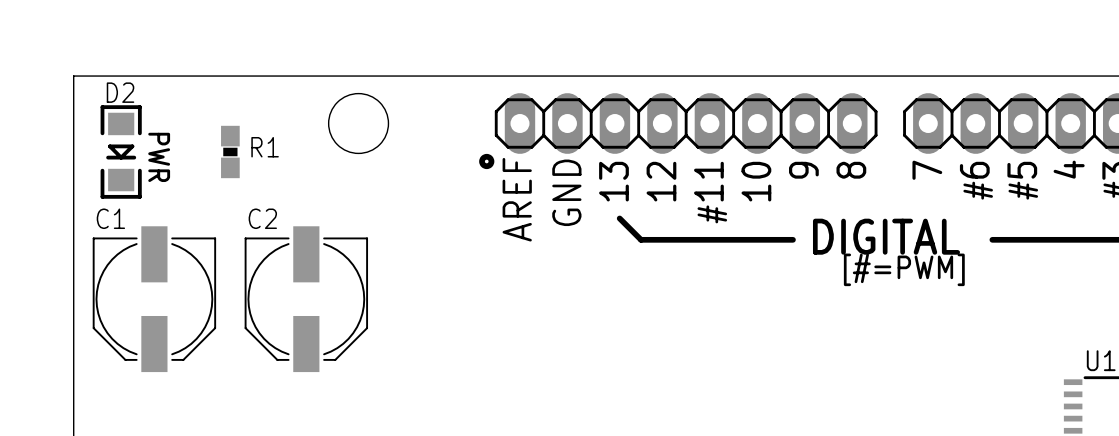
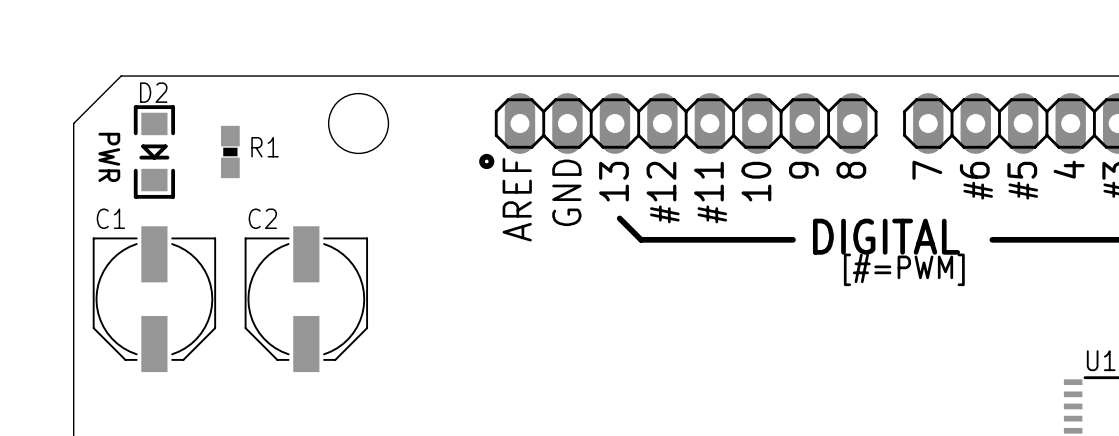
board edge: (121, 76) (73, 76) (73, 123) -> (121, 76) (73, 123)
D2 position: (121, 151) -> (154, 151)
text position: PWR (159, 157) -> PWR (109, 157)
text: none -> # (664, 214)

